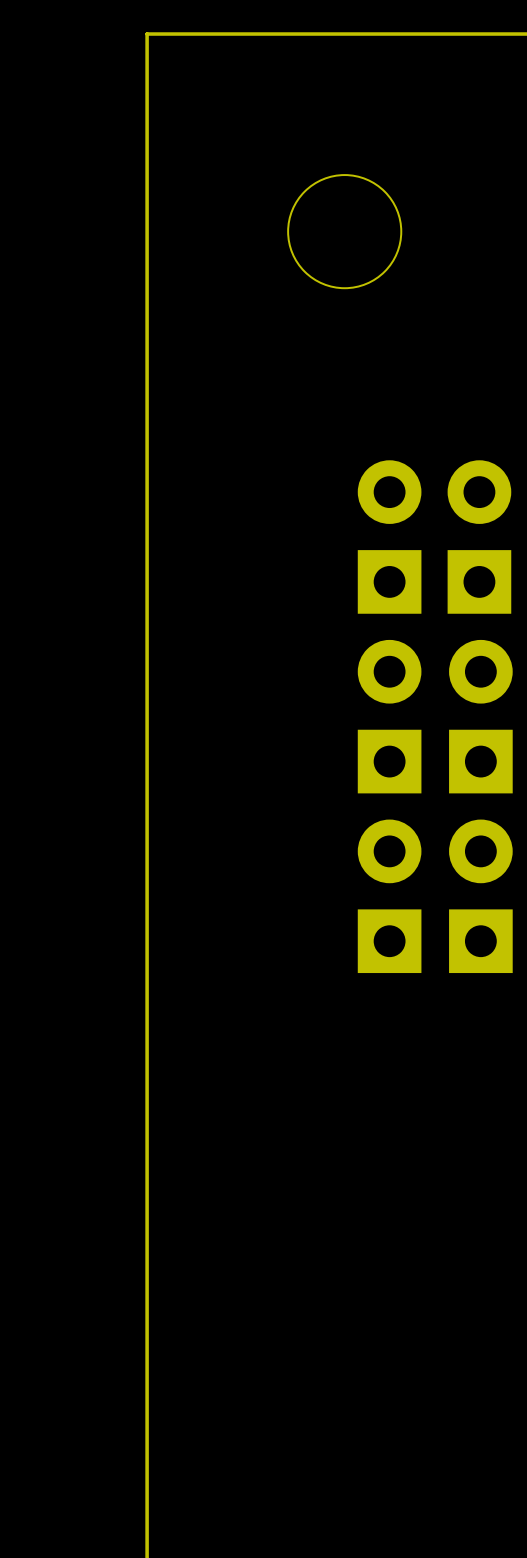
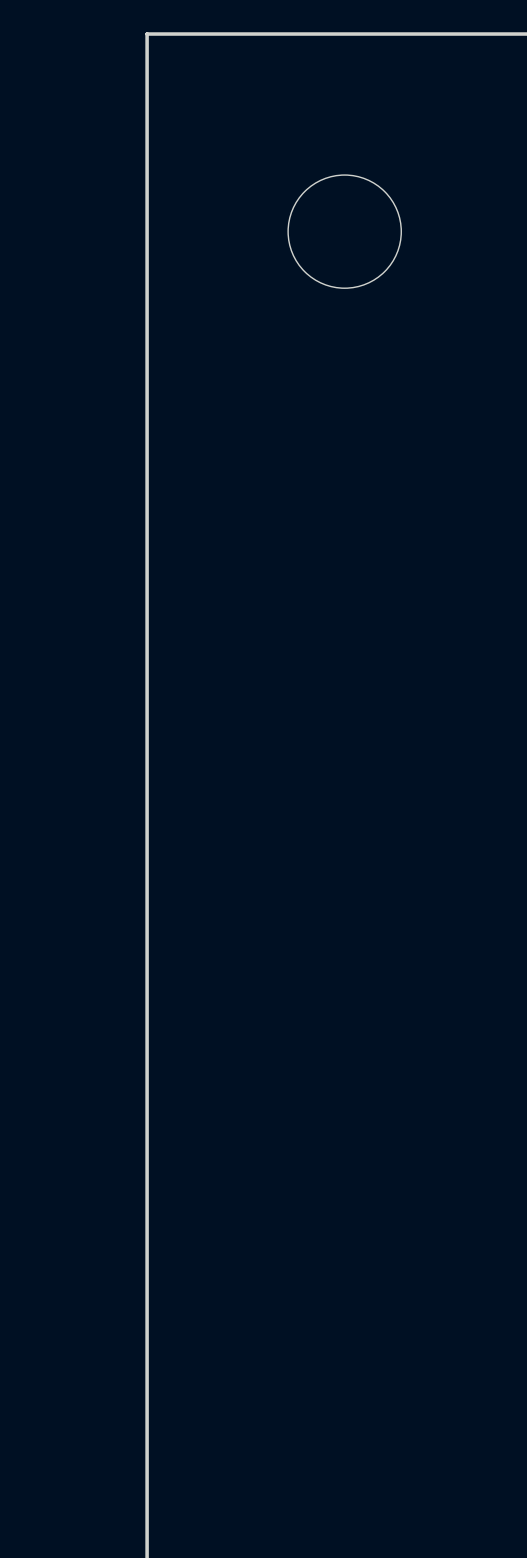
part: (389, 537) -> none
part: (479, 537) -> none
part: (389, 716) -> none
part: (480, 716) -> none
part: (389, 896) -> none
part: (480, 896) -> none

